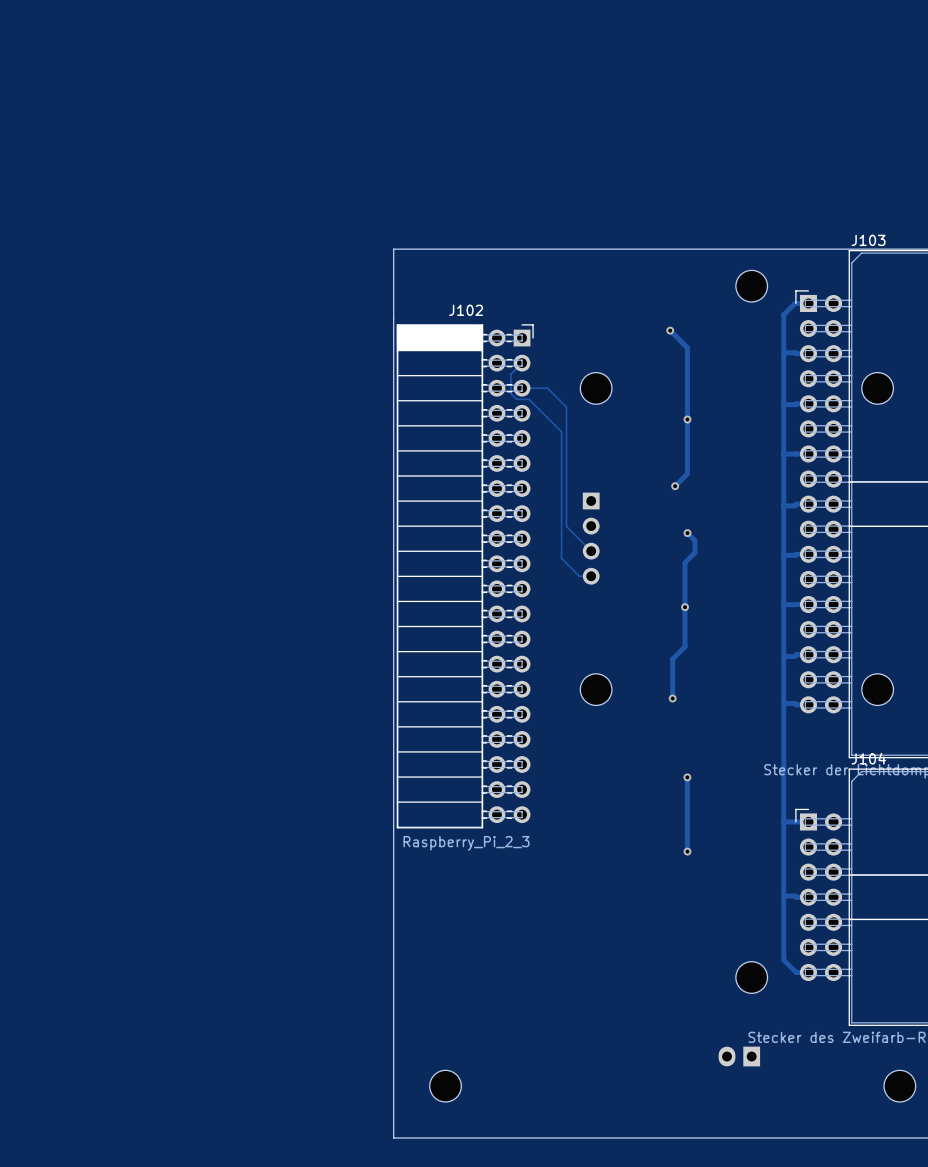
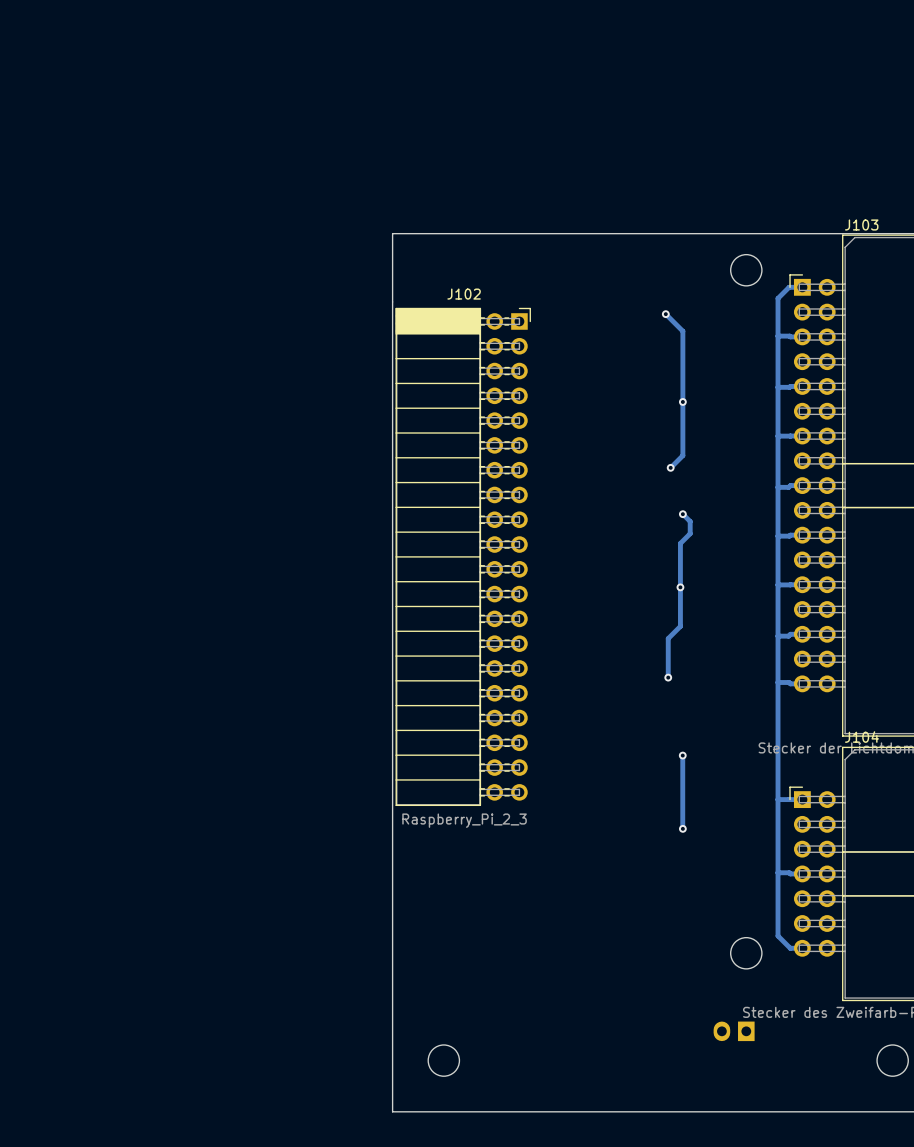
track: (522, 363) (510, 374) (510, 393) (516, 399) (529, 399) (561, 431) (561, 558) (579, 576) (591, 576) -> none
track: (522, 388) (547, 388) (566, 407) (566, 526) (591, 551) -> none
part: (596, 388) -> none
part: (877, 388) -> none
part: (591, 538) -> none
part: (596, 689) -> none
part: (877, 689) -> none

